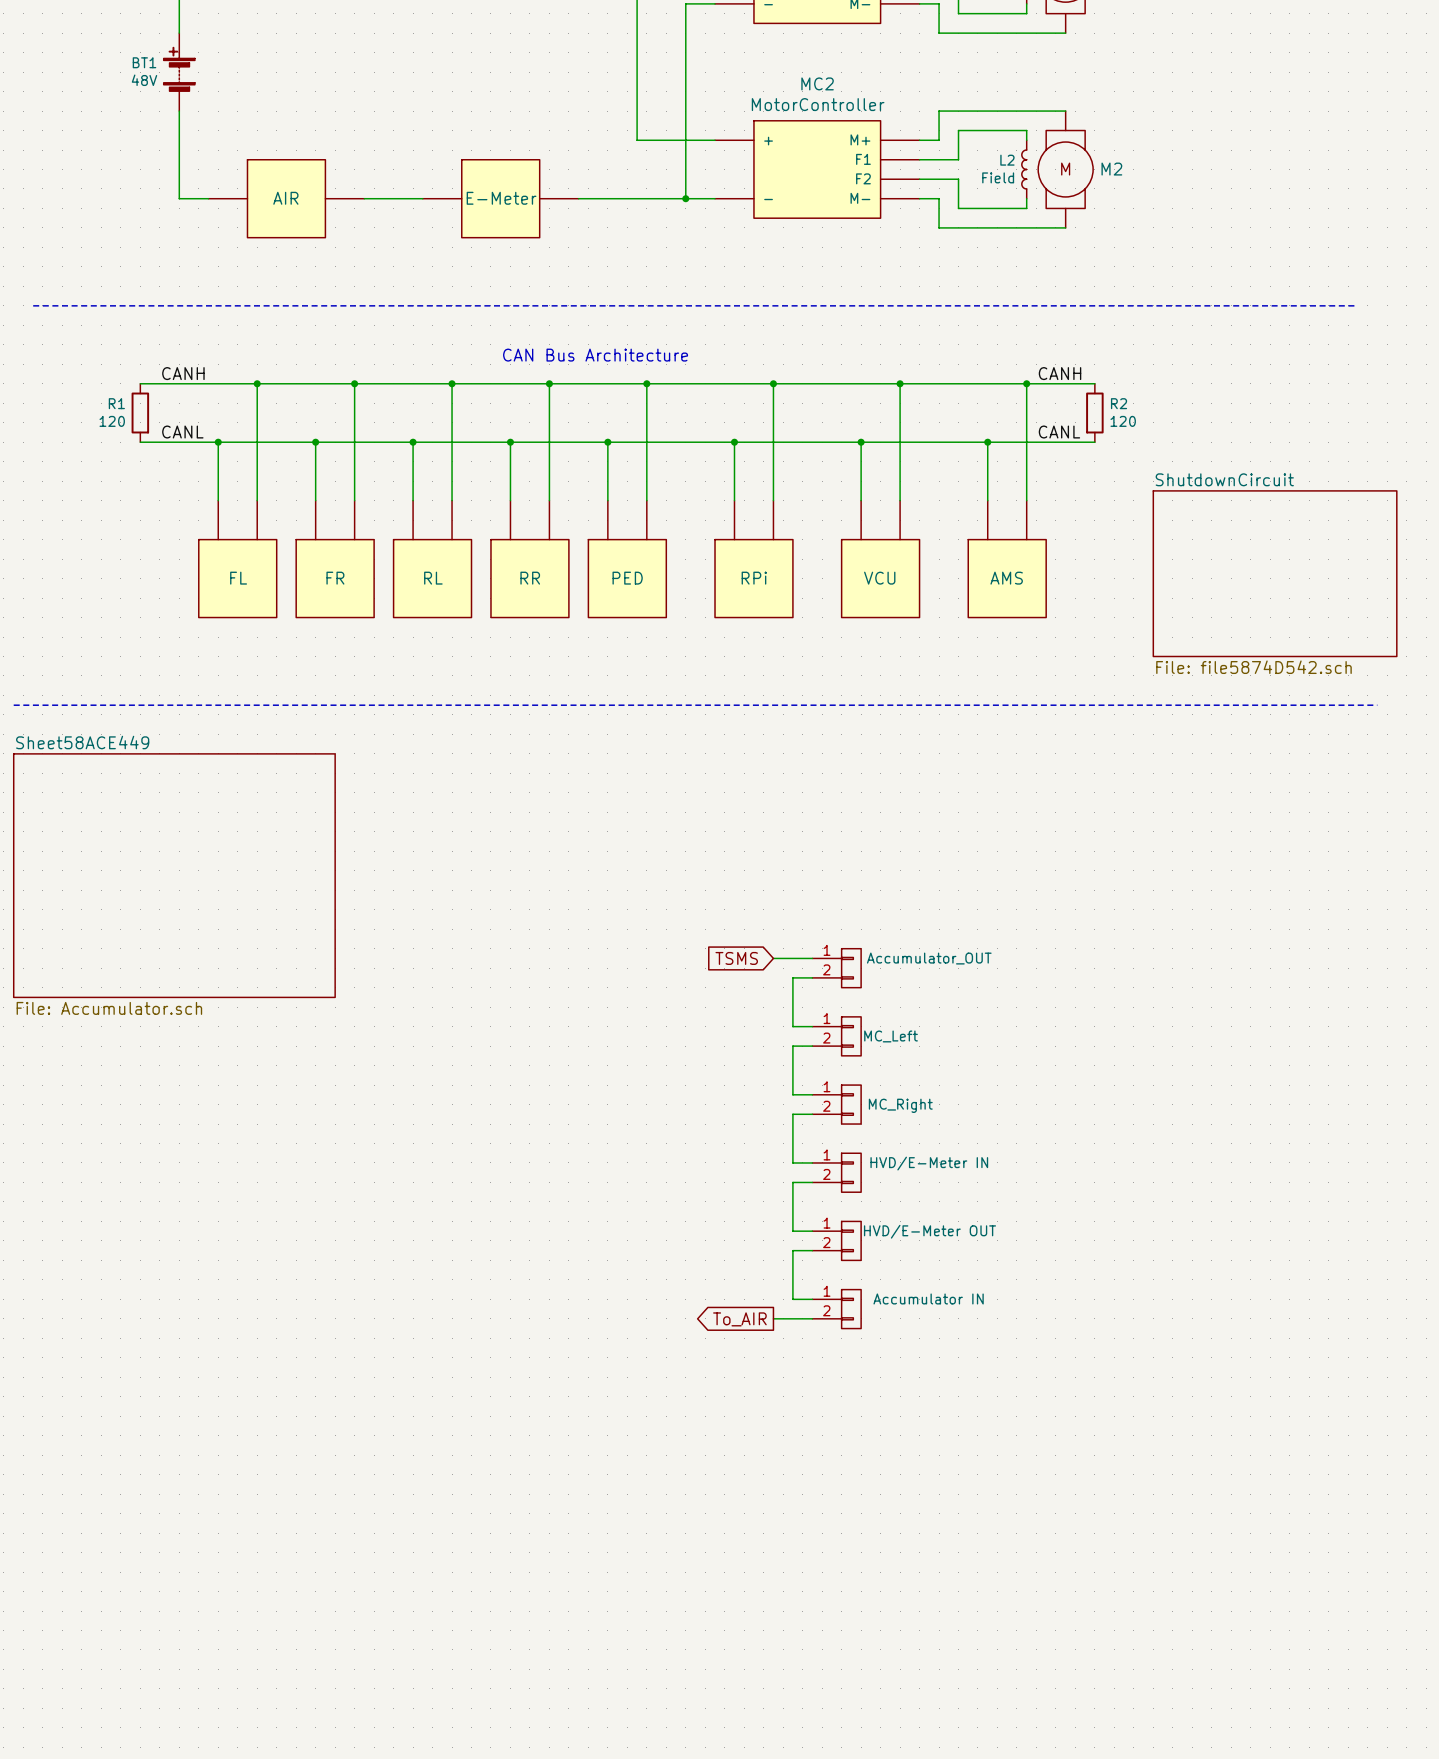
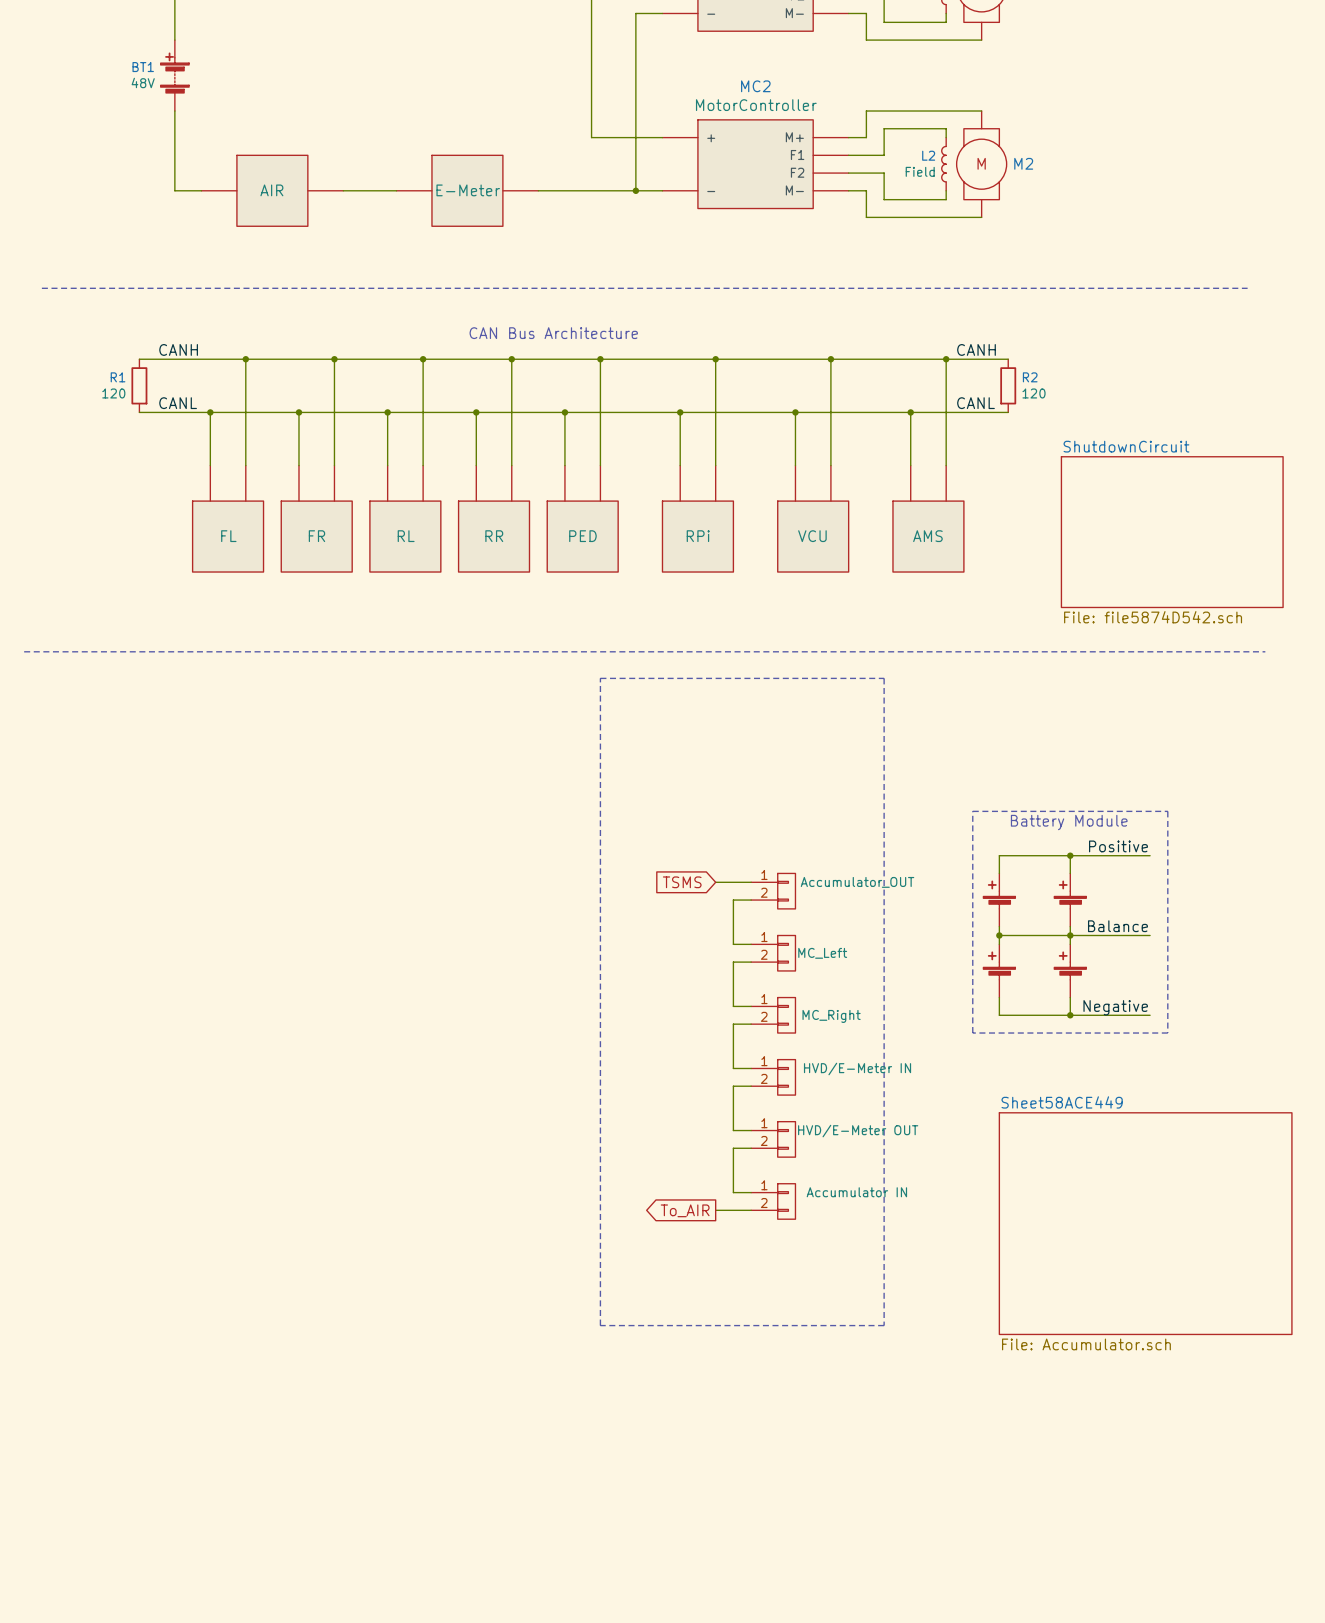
line: none -> (600, 678) (884, 678) (884, 1325) (600, 1325) (600, 678)
sheet Sheet58ACE449 position: (174, 875) -> (1145, 1223)
line: none -> (972, 811) (1167, 811) (1167, 1033) (972, 1033) (972, 811)
text: none -> Battery Module (1069, 822)
label: none -> Positive (1118, 846)
wire: none -> (1070, 855) (1070, 873)
junction: none -> (1070, 855)
wire: none -> (1150, 855) (999, 855) (999, 873)
part: none -> (999, 900)
part: none -> (1070, 900)
label: none -> Balance (1117, 926)
wire: none -> (999, 926) (999, 944)
wire: none -> (1070, 926) (1070, 944)
wire: none -> (999, 935) (1150, 935)
junction: none -> (999, 935)
junction: none -> (1070, 935)
part: none -> (999, 970)
part: none -> (1070, 970)
wire: none -> (999, 997) (999, 1015) (1150, 1015)
wire: none -> (1070, 997) (1070, 1015)
label: none -> Negative (1115, 1007)
junction: none -> (1070, 1015)

